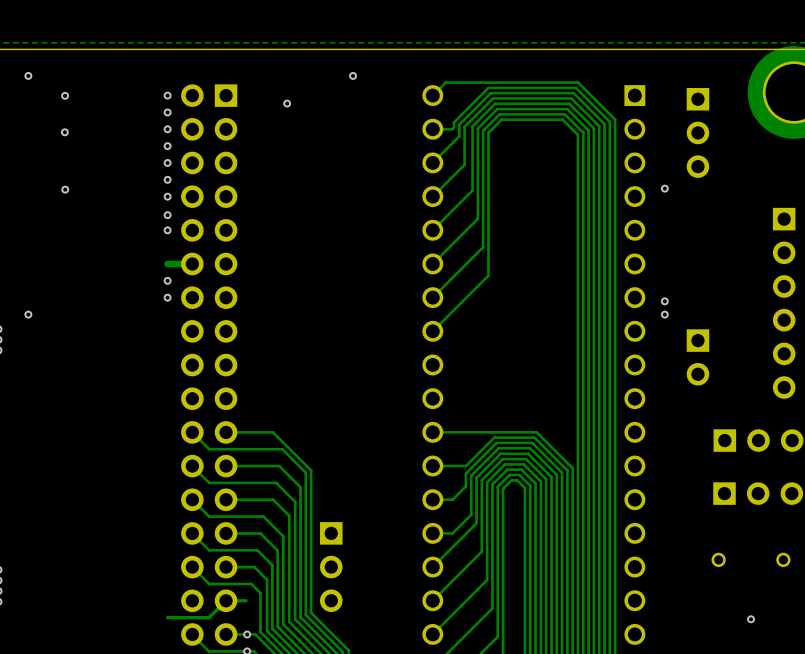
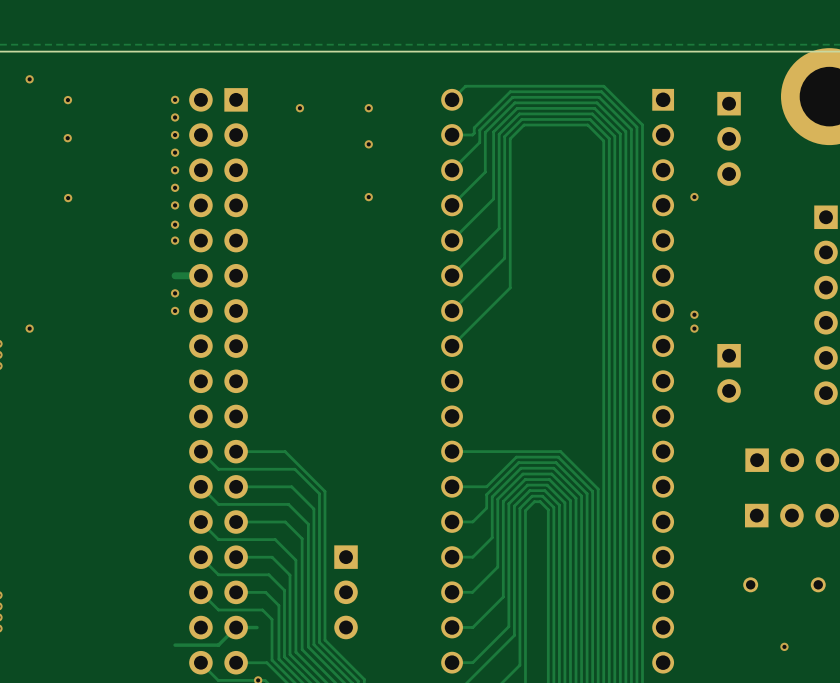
via position: (353, 75) -> (368, 108)
via: none -> (368, 144)
via: none -> (368, 197)
part position: (784, 303) -> (826, 305)
track: (476, 523) (432, 567) -> (497, 546) (497, 567) (472, 592) (452, 592)
track: (481, 551) (432, 600) -> (503, 576) (503, 597) (472, 627) (452, 627)
track: (487, 580) (432, 634) -> (508, 605) (508, 626) (472, 662) (452, 662)
via: (247, 634) -> none

